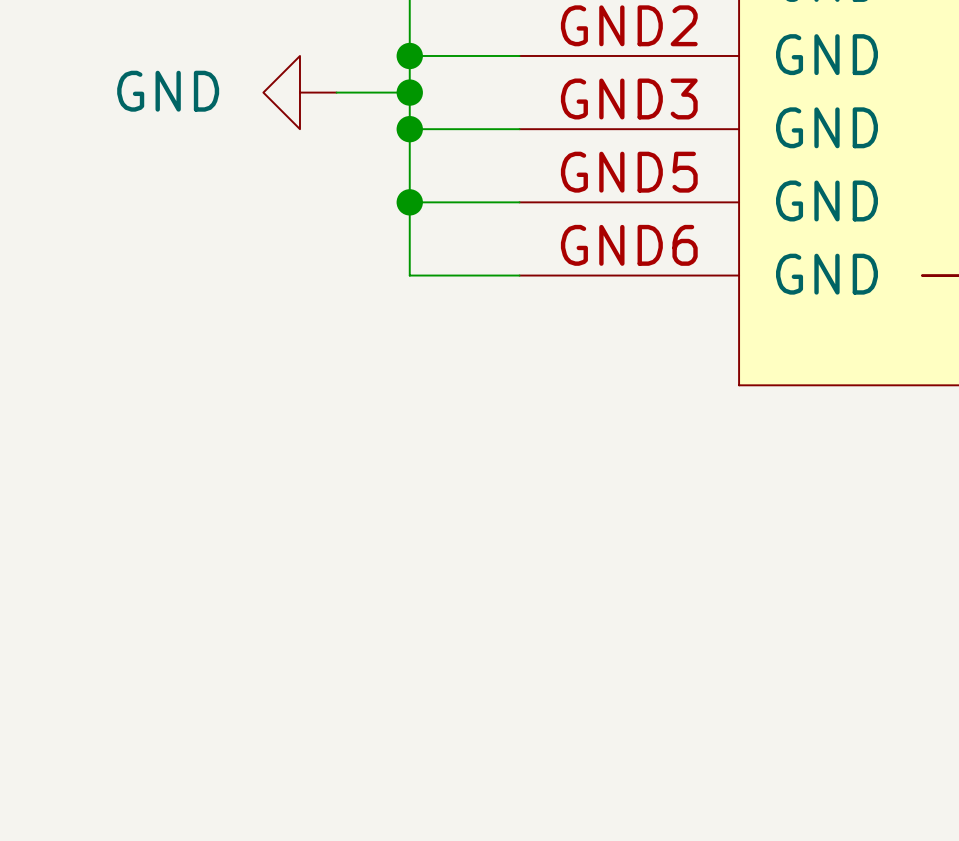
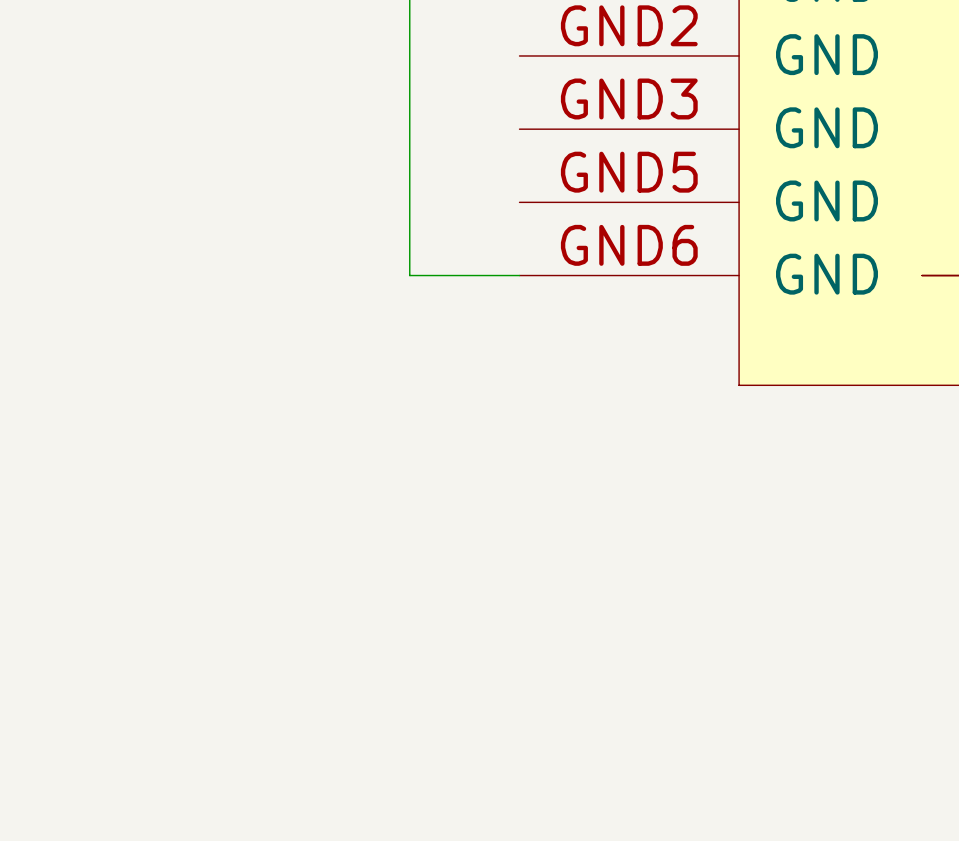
wire: (409, 55) (519, 55) -> none
junction: (409, 55) -> none
power symbol: GND (299, 92) -> none
wire: (336, 92) (409, 92) -> none
junction: (409, 92) -> none
wire: (409, 129) (519, 129) -> none
junction: (409, 129) -> none
wire: (409, 202) (519, 202) -> none
junction: (409, 202) -> none

